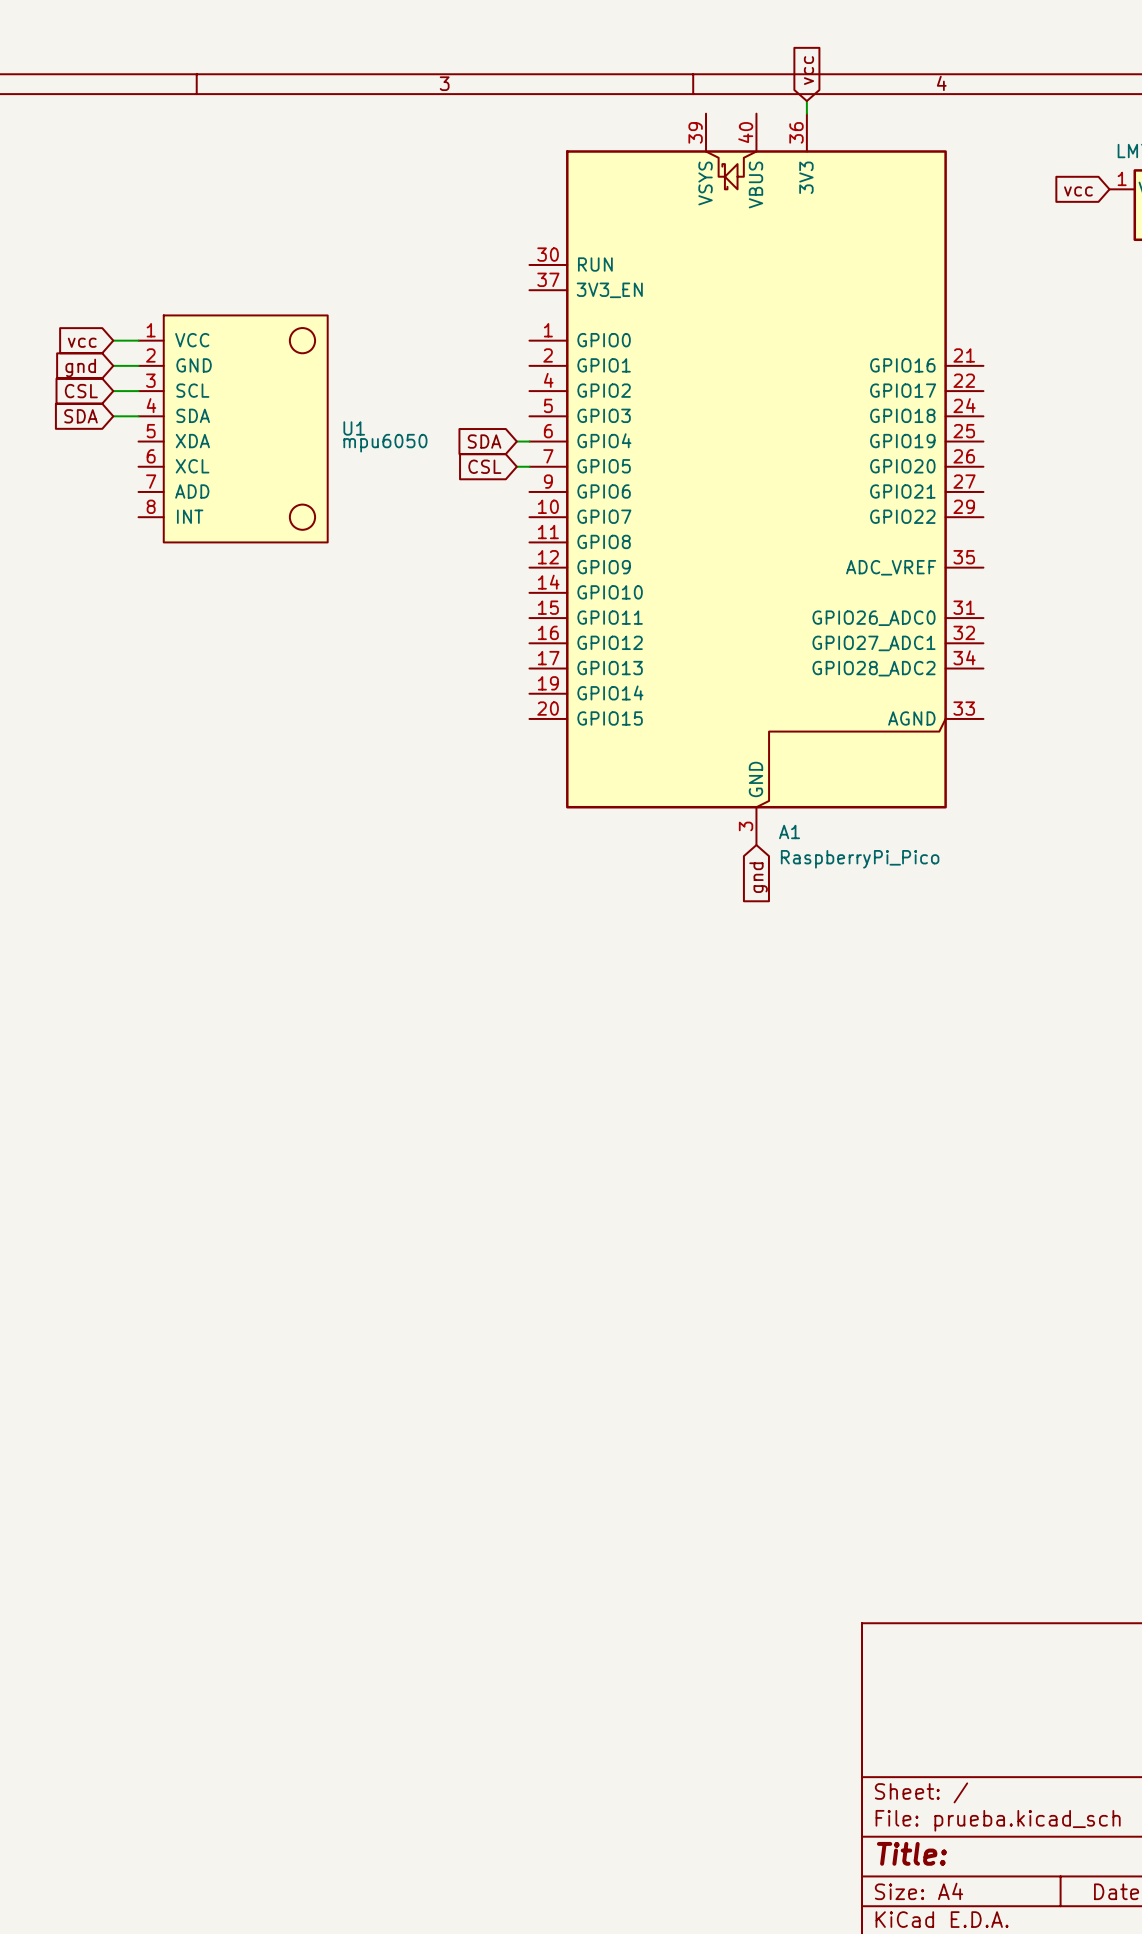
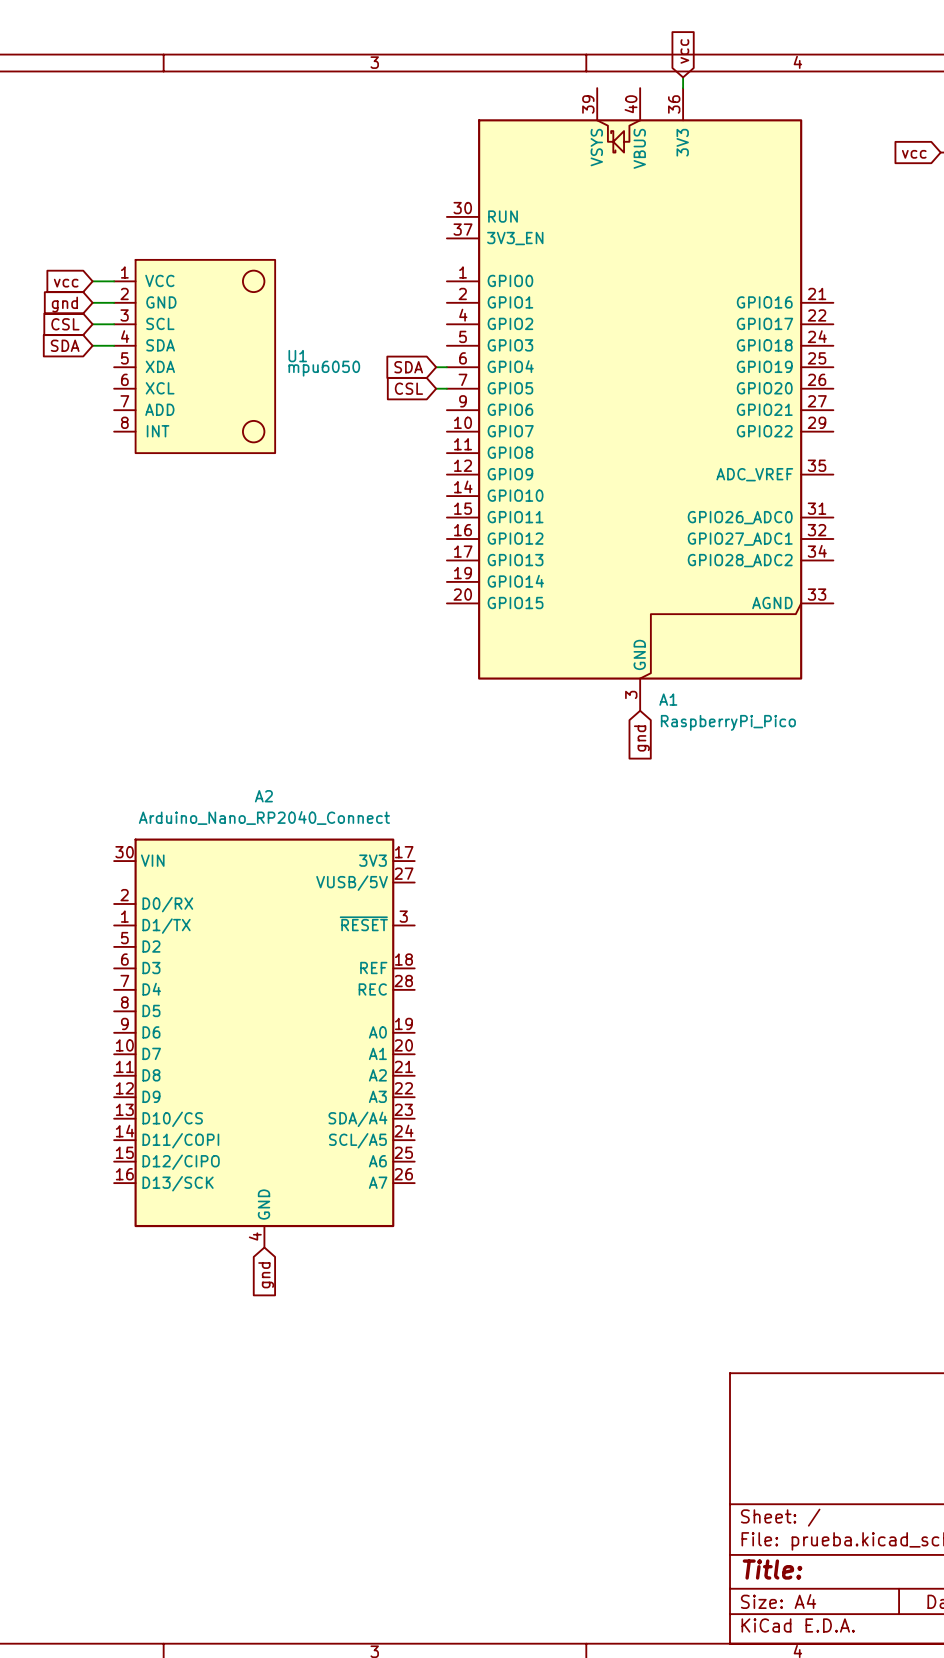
A2: none -> Arduino_Nano_RP2040_Connect (264, 1043)
global label: none -> gnd (266, 1275)

